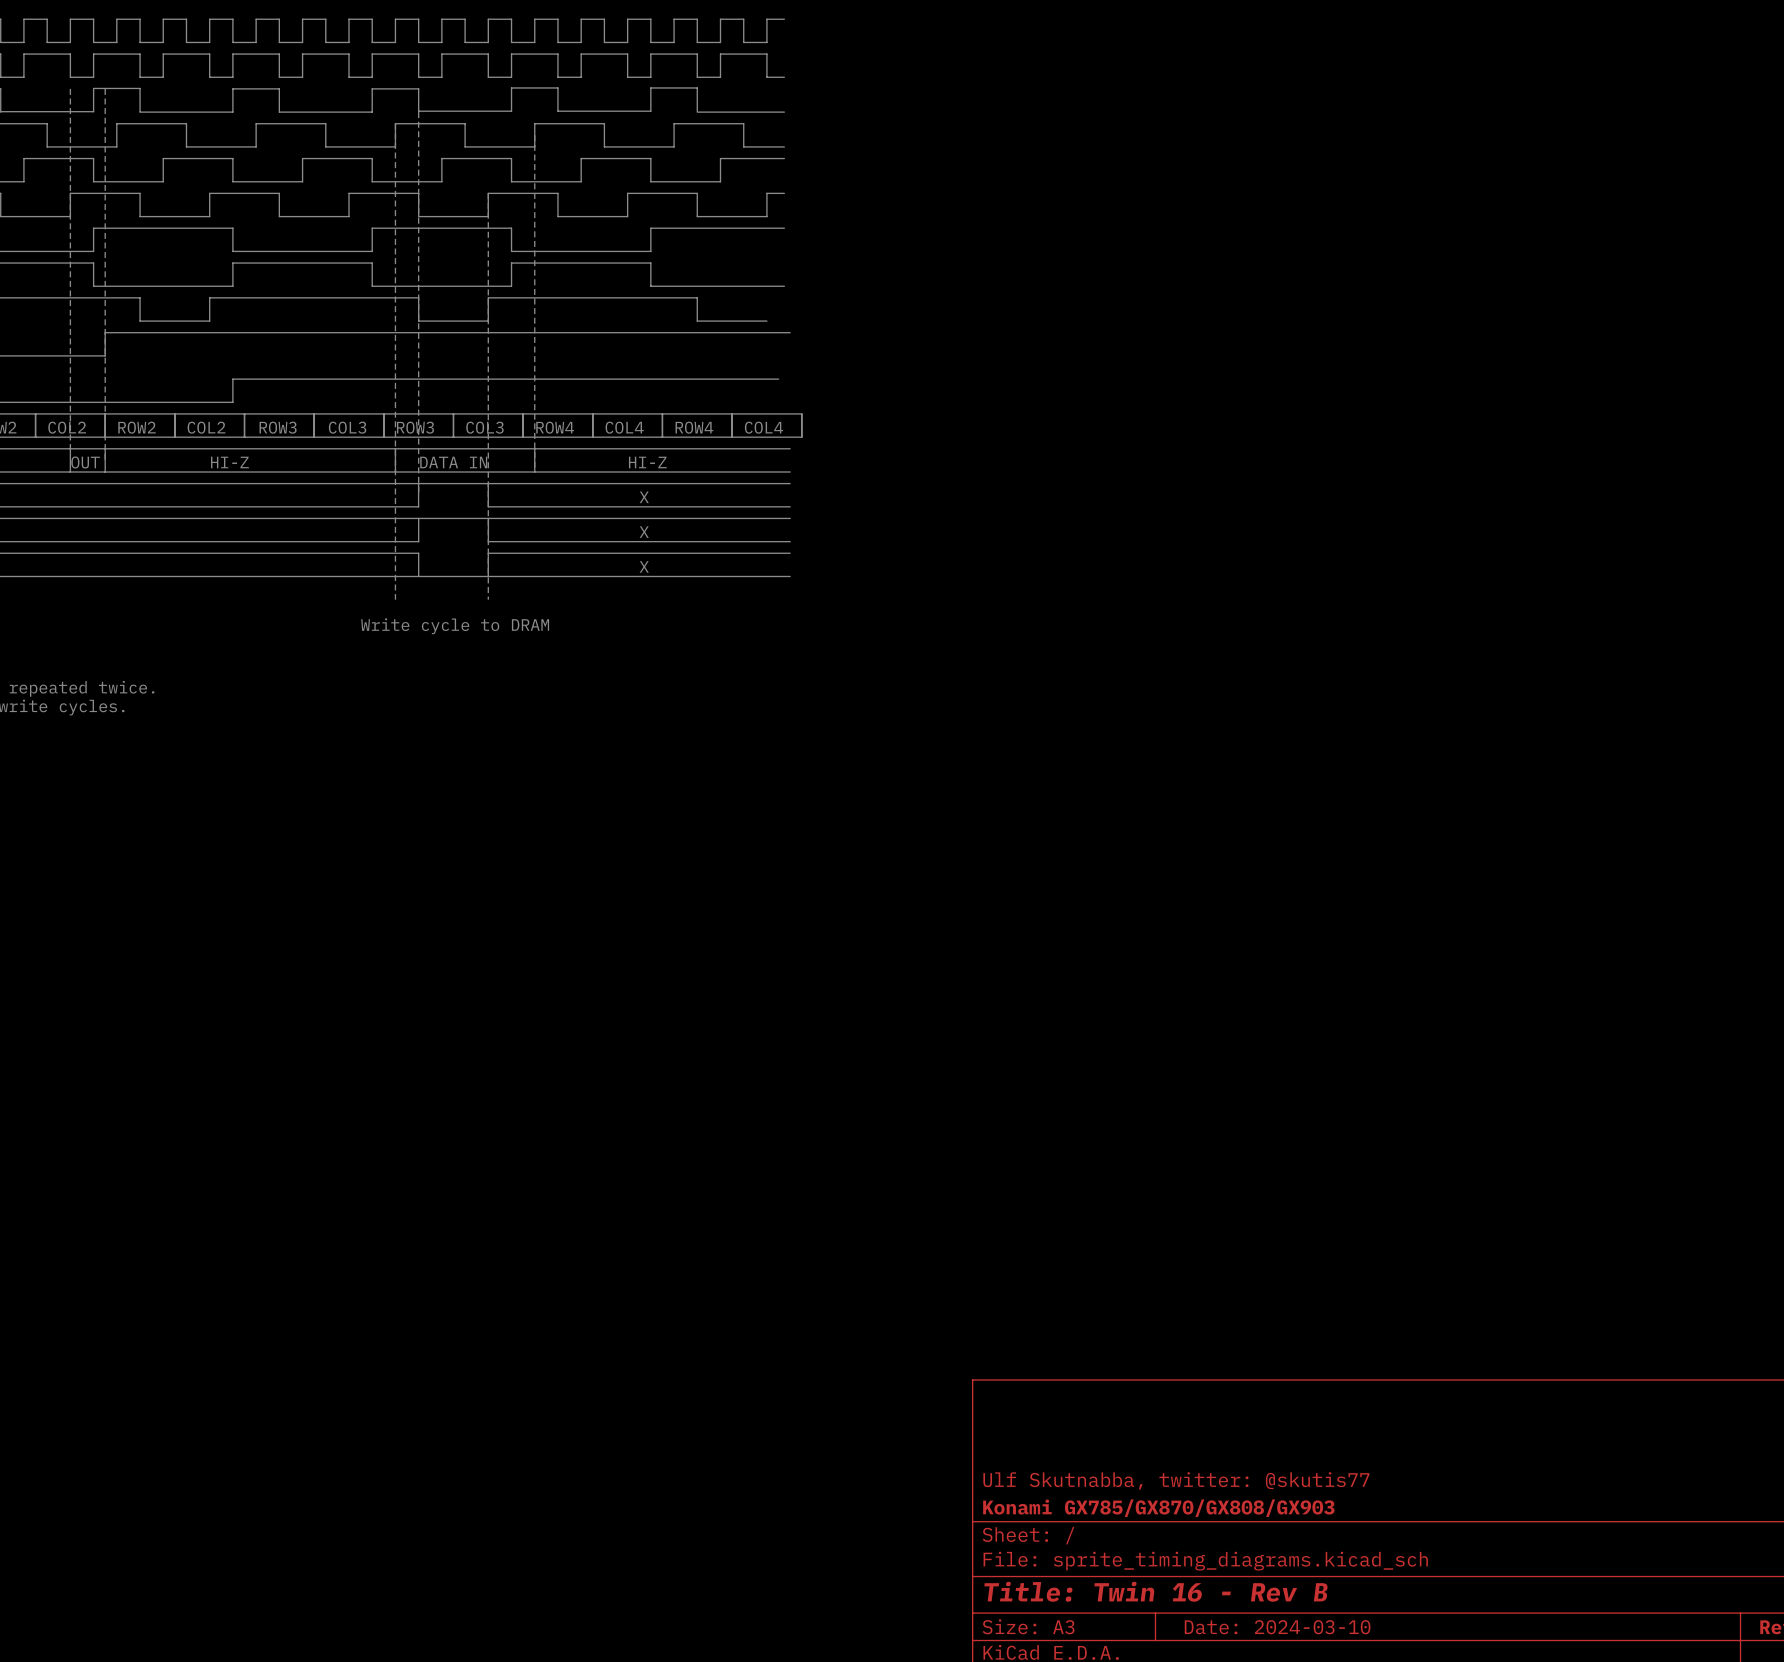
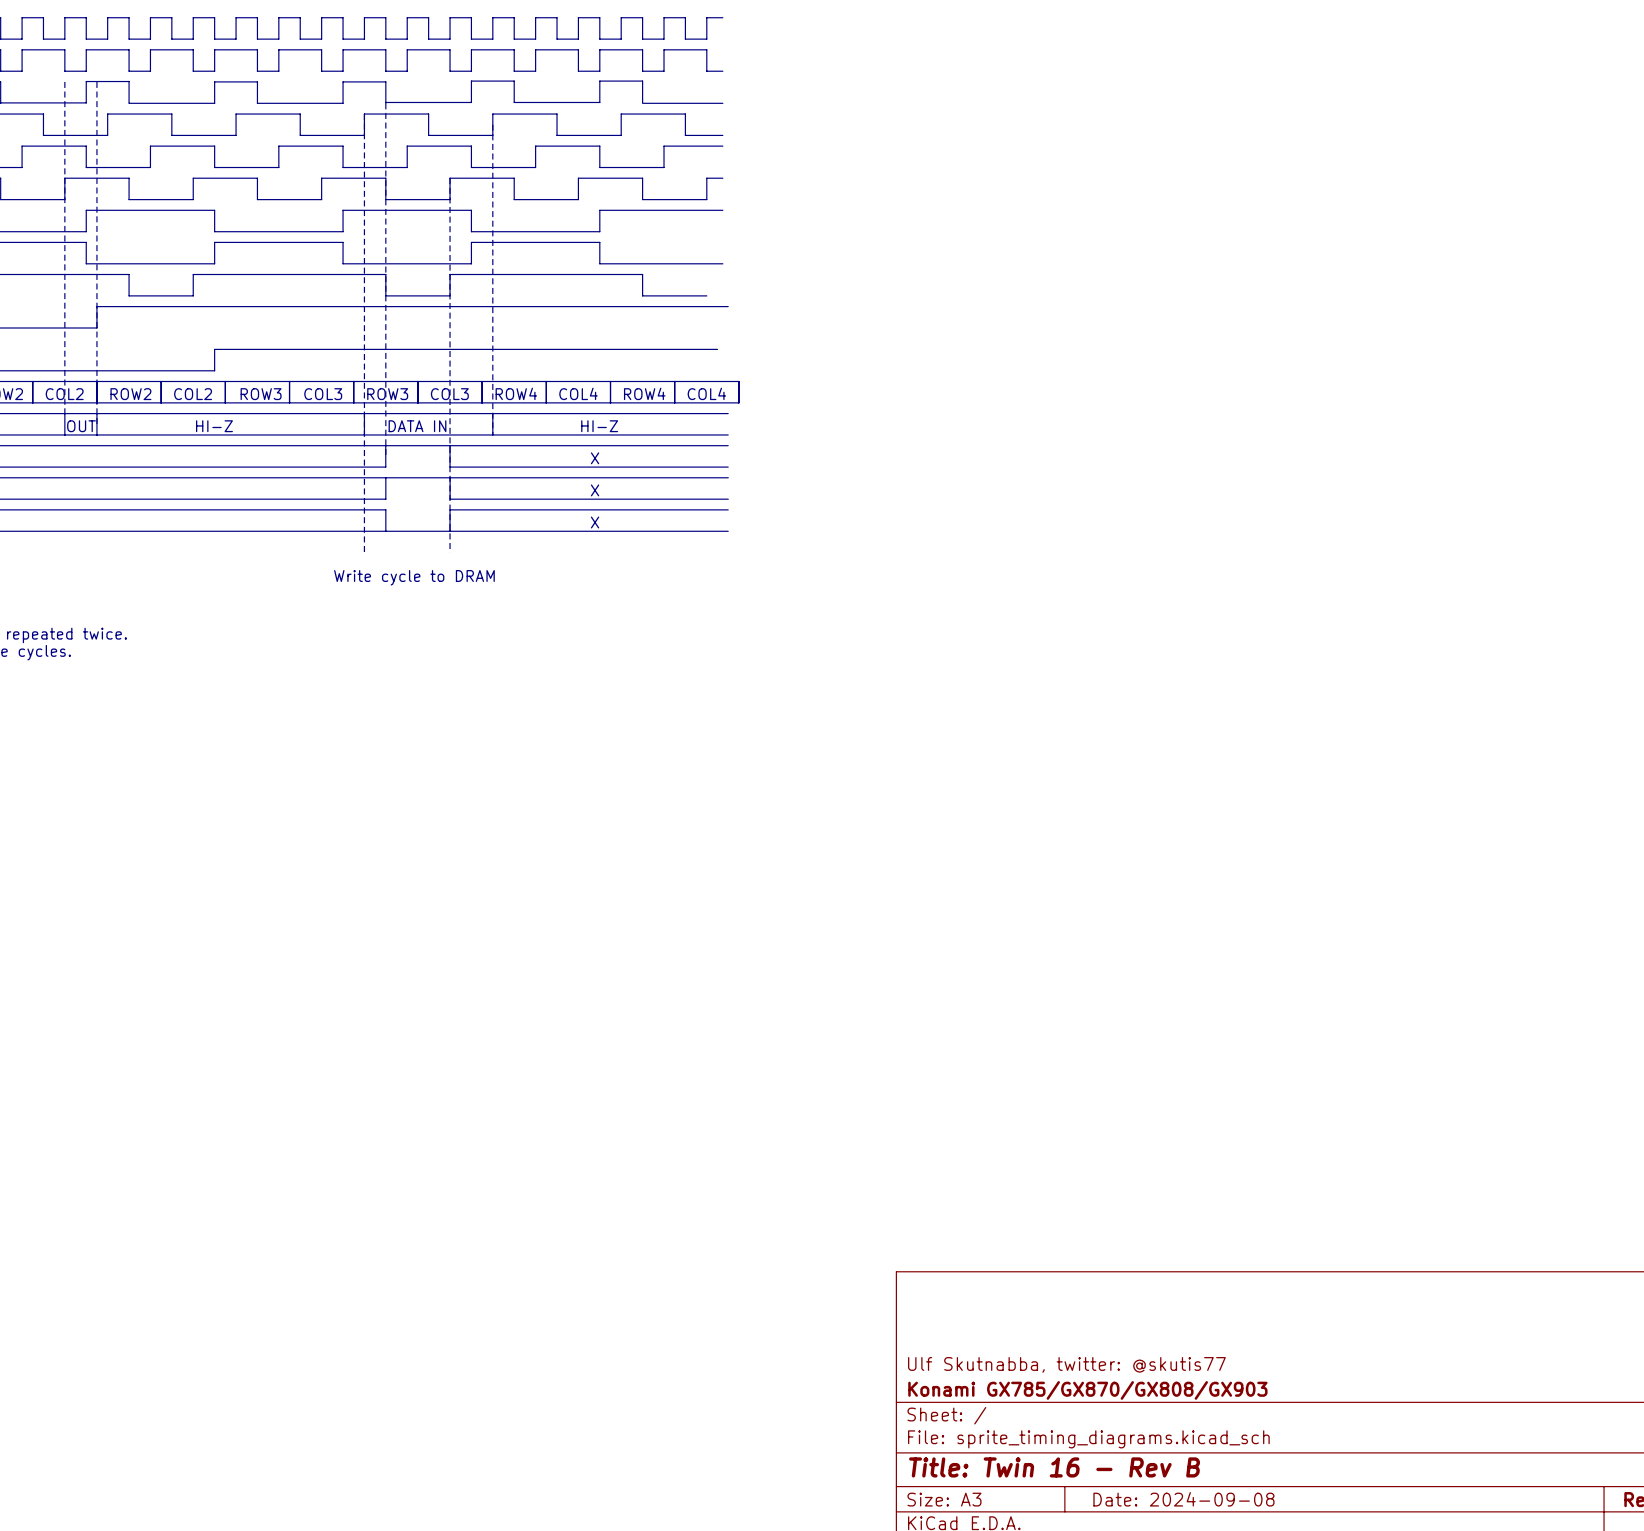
title block: Date: 2024-03-10 (1277, 1627) -> Date: 2024-09-08 (1183, 1499)

